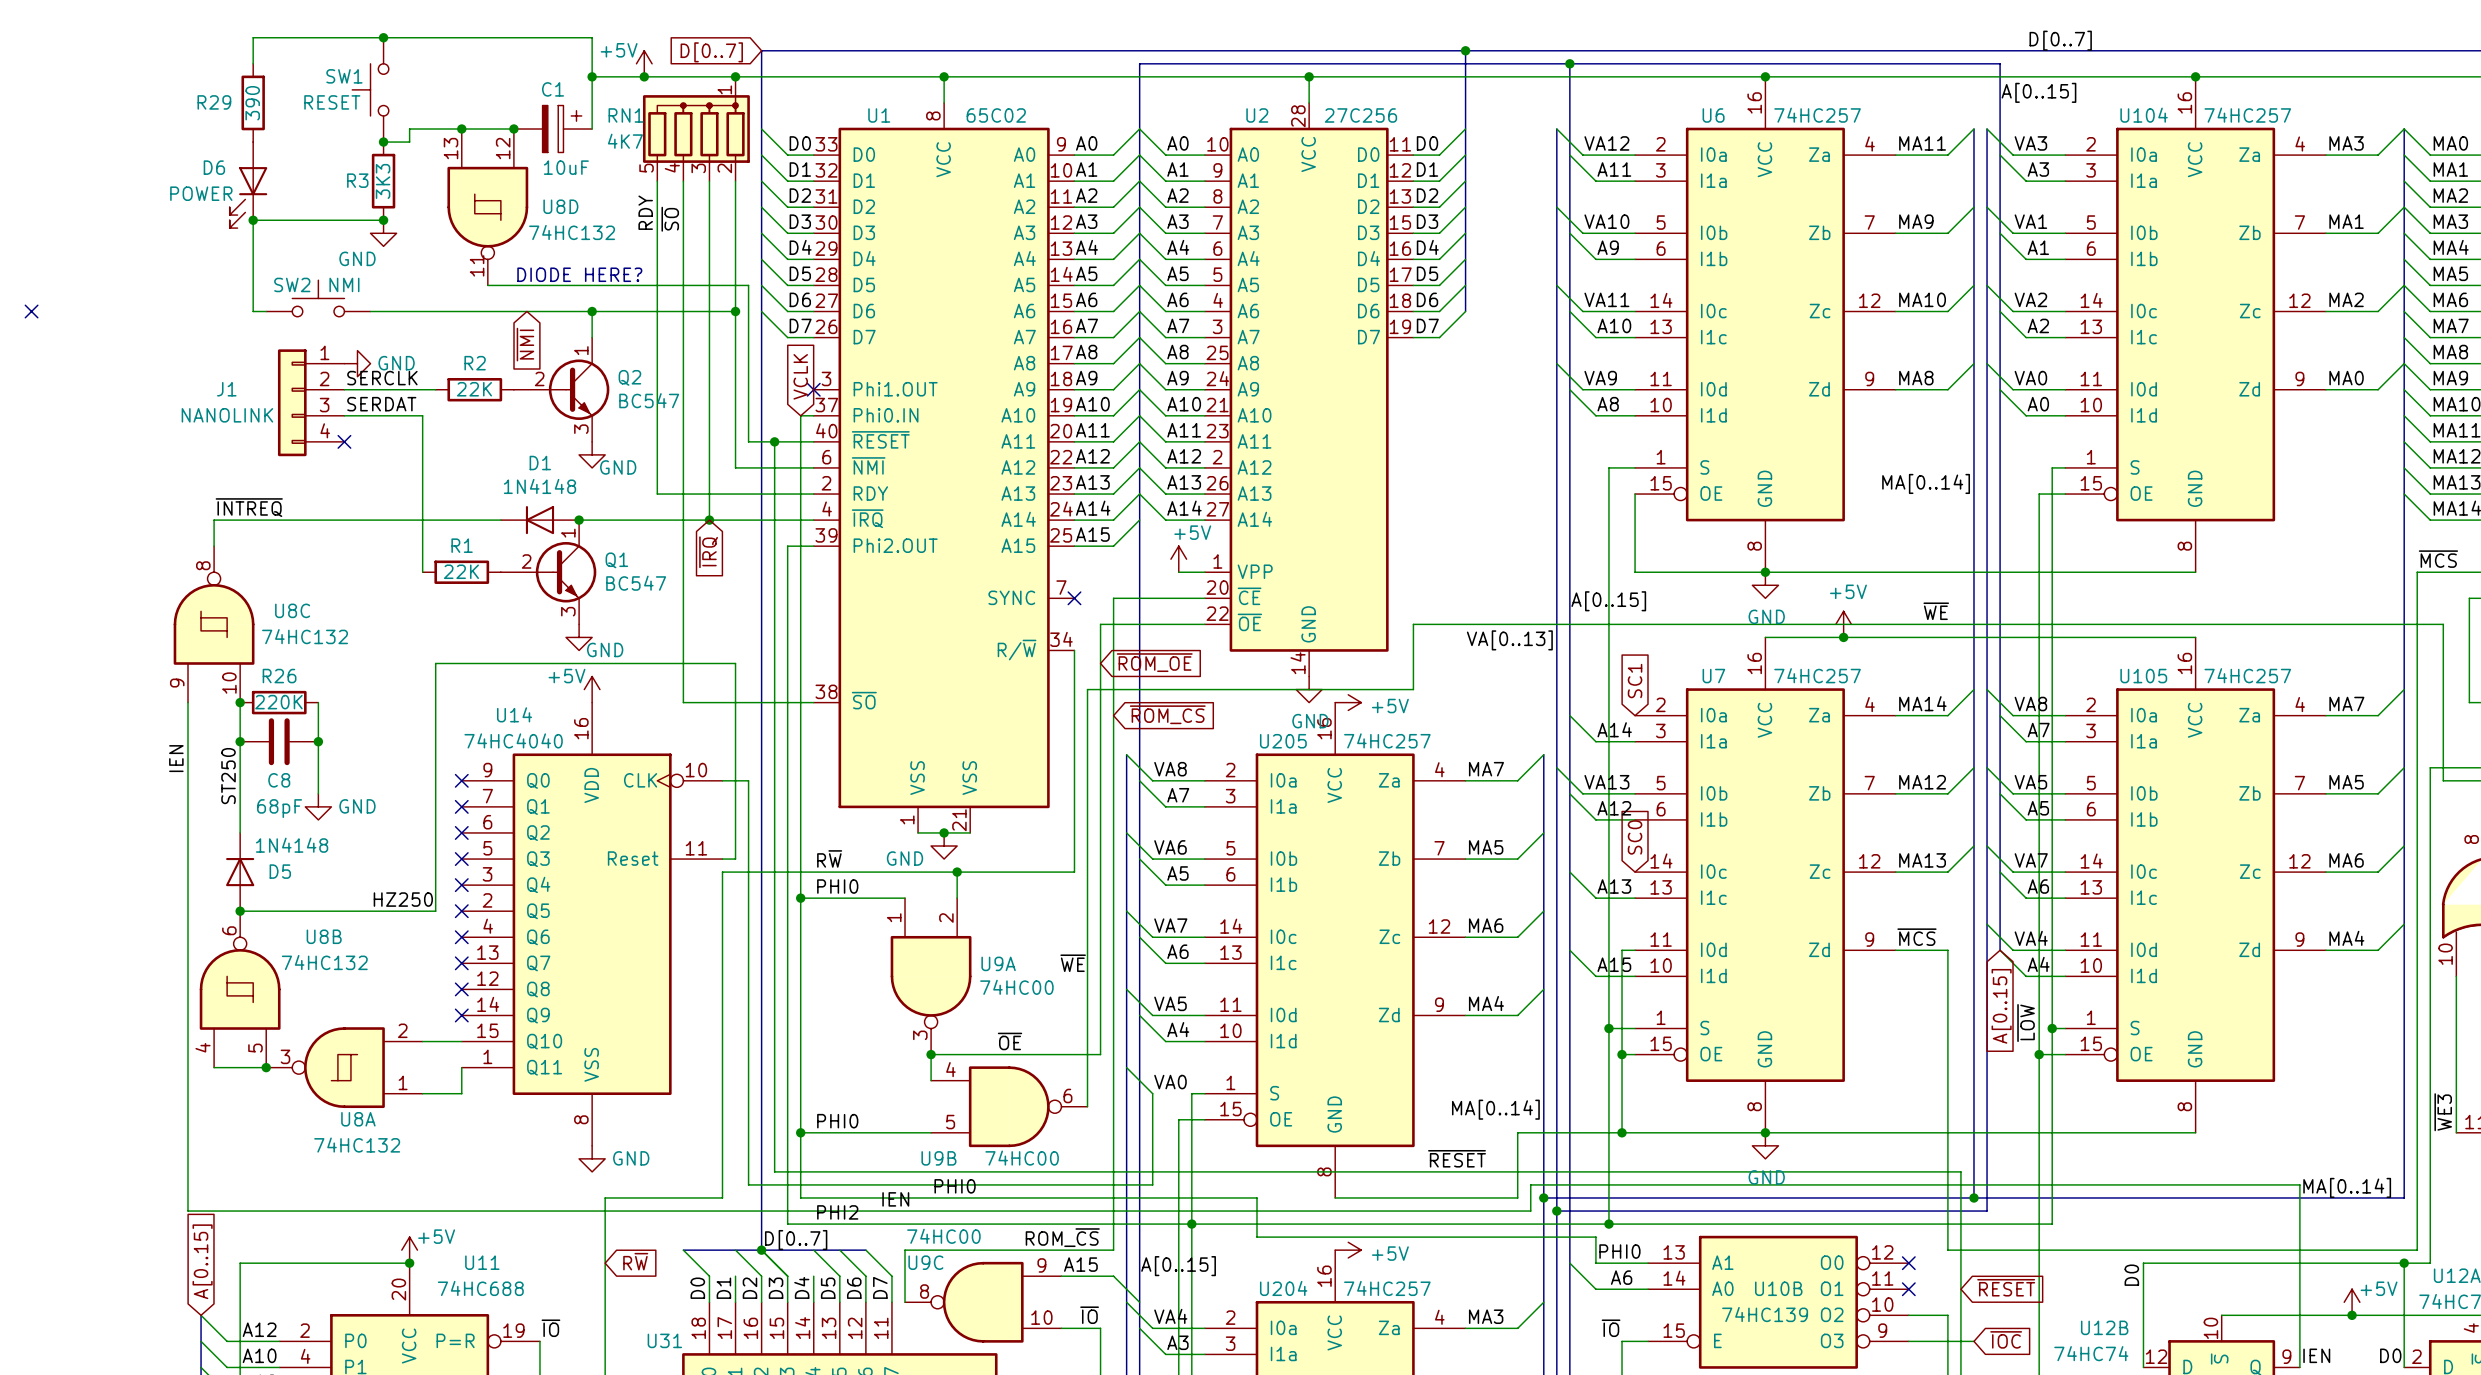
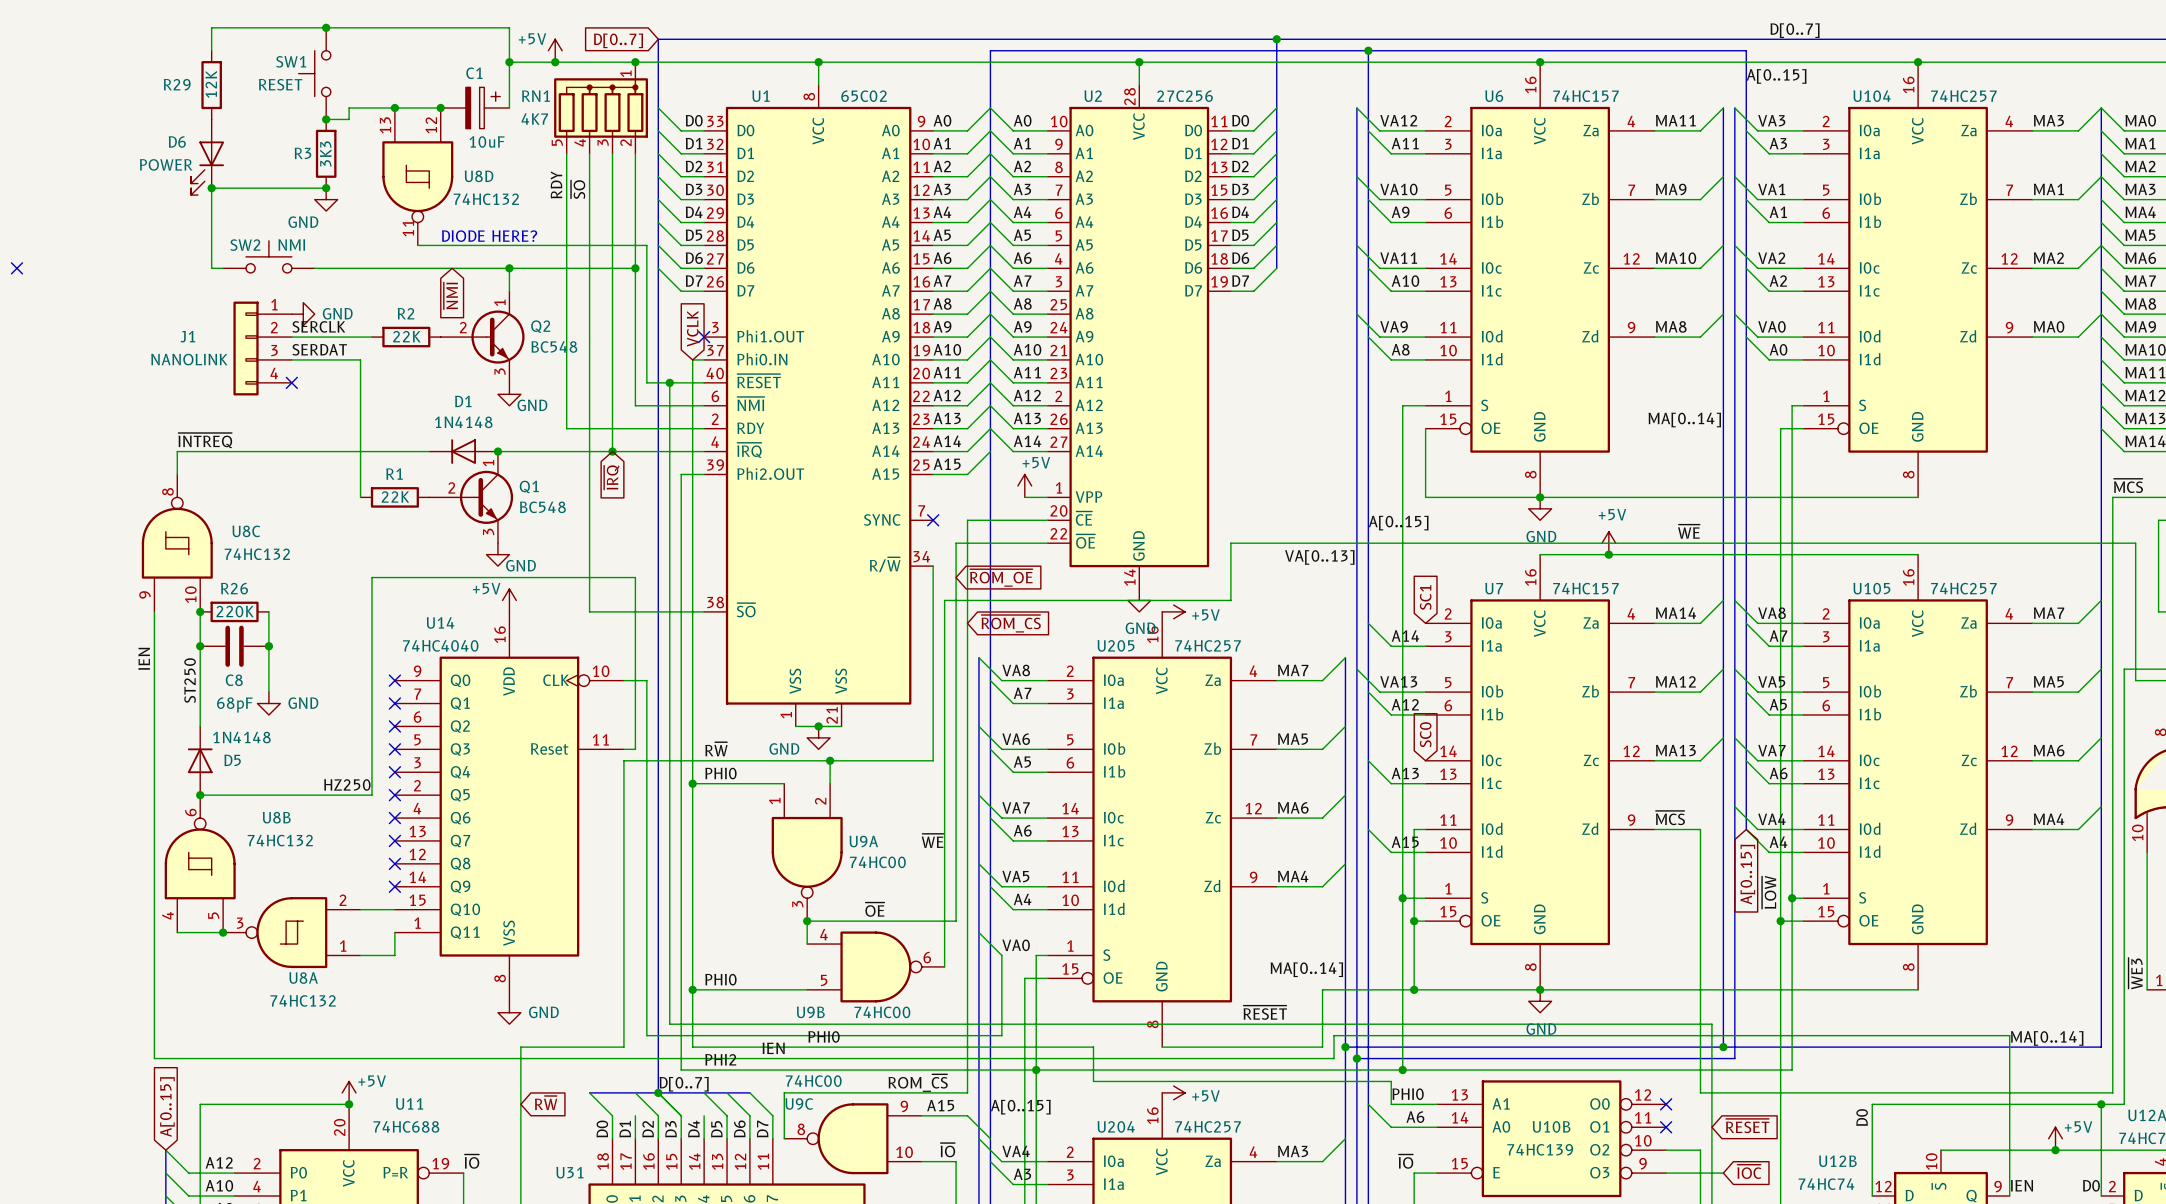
R29 value: 390 (252, 103) -> 12K (211, 84)
U6 value: 74HC257 (1817, 115) -> 74HC157 (1585, 96)
Q2 value: BC547 (649, 400) -> BC548 (554, 346)
Q1 value: BC547 (636, 583) -> BC548 (542, 507)
U7 value: 74HC257 (1817, 675) -> 74HC157 (1585, 588)

